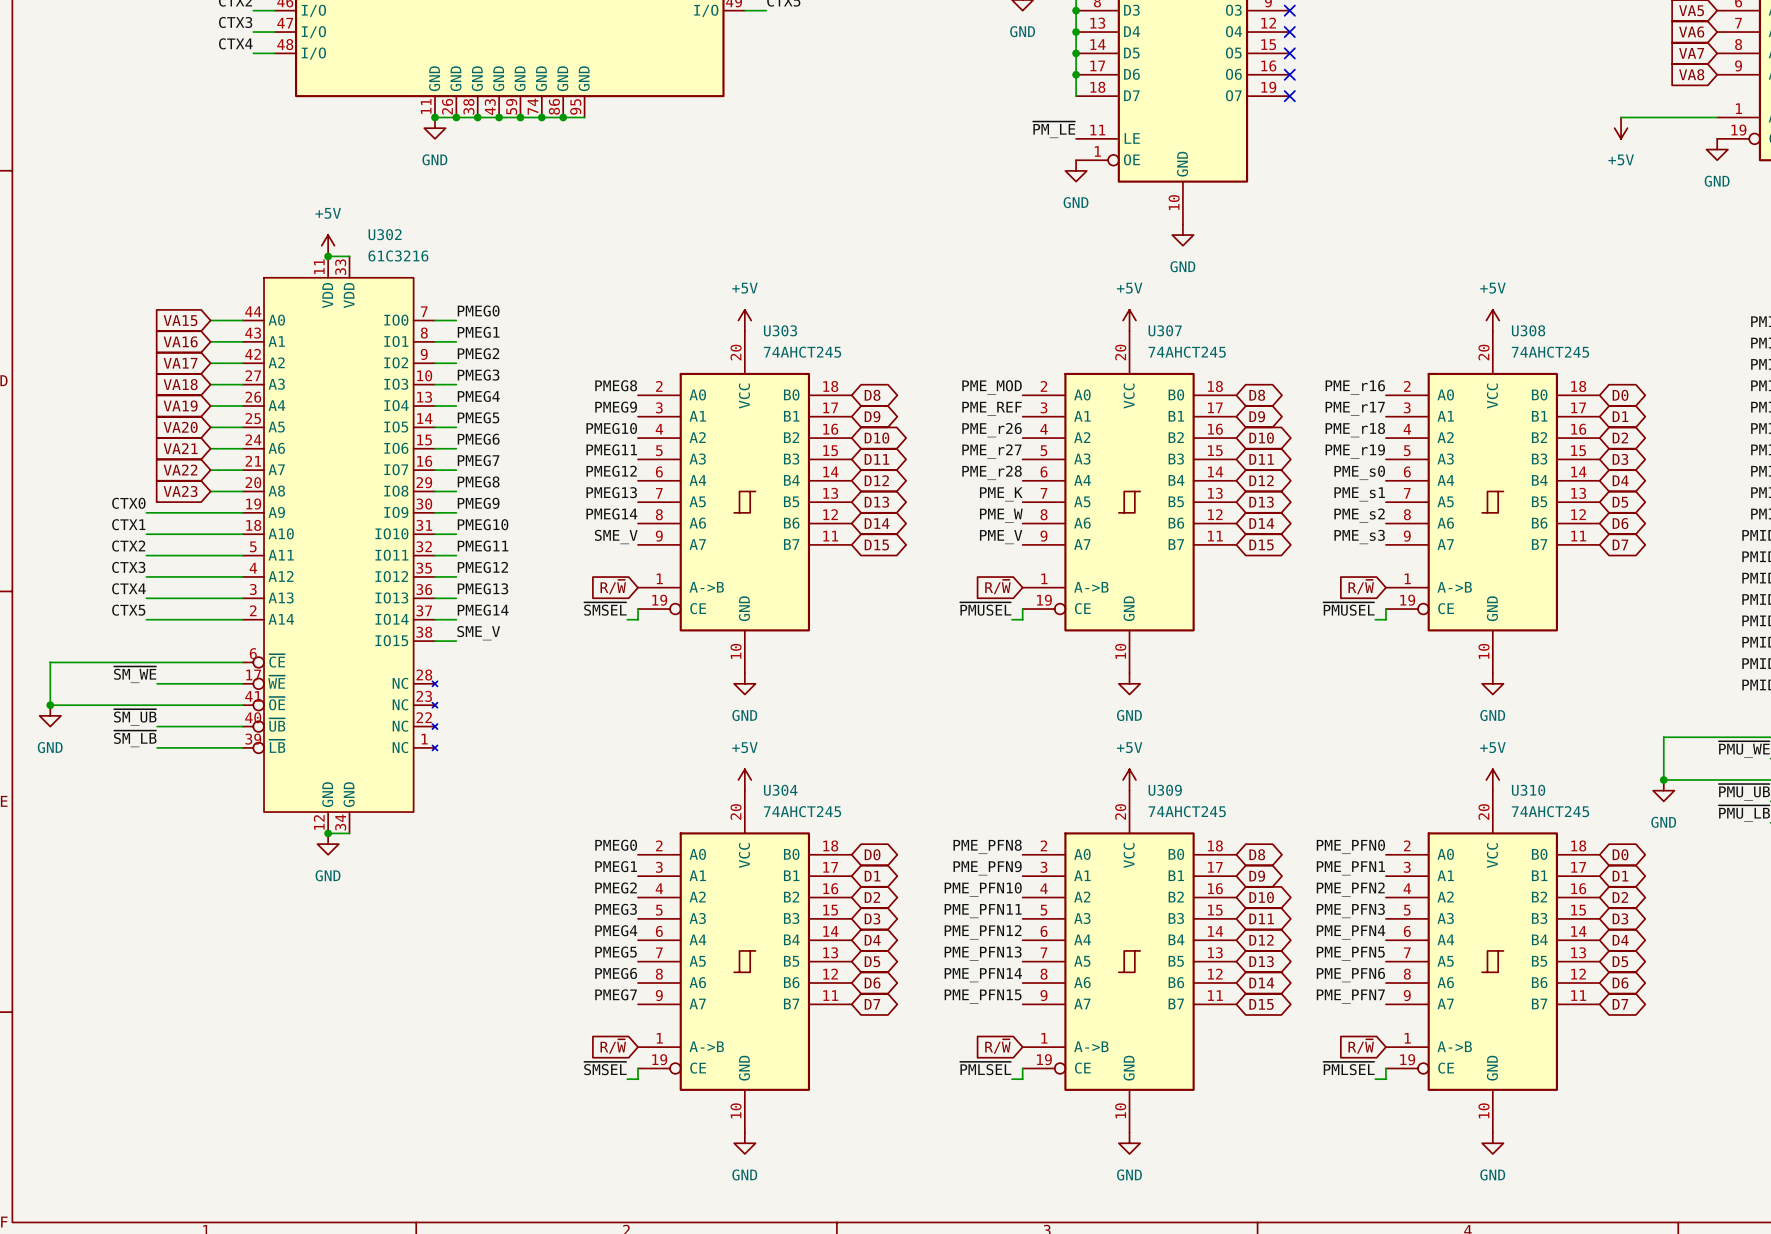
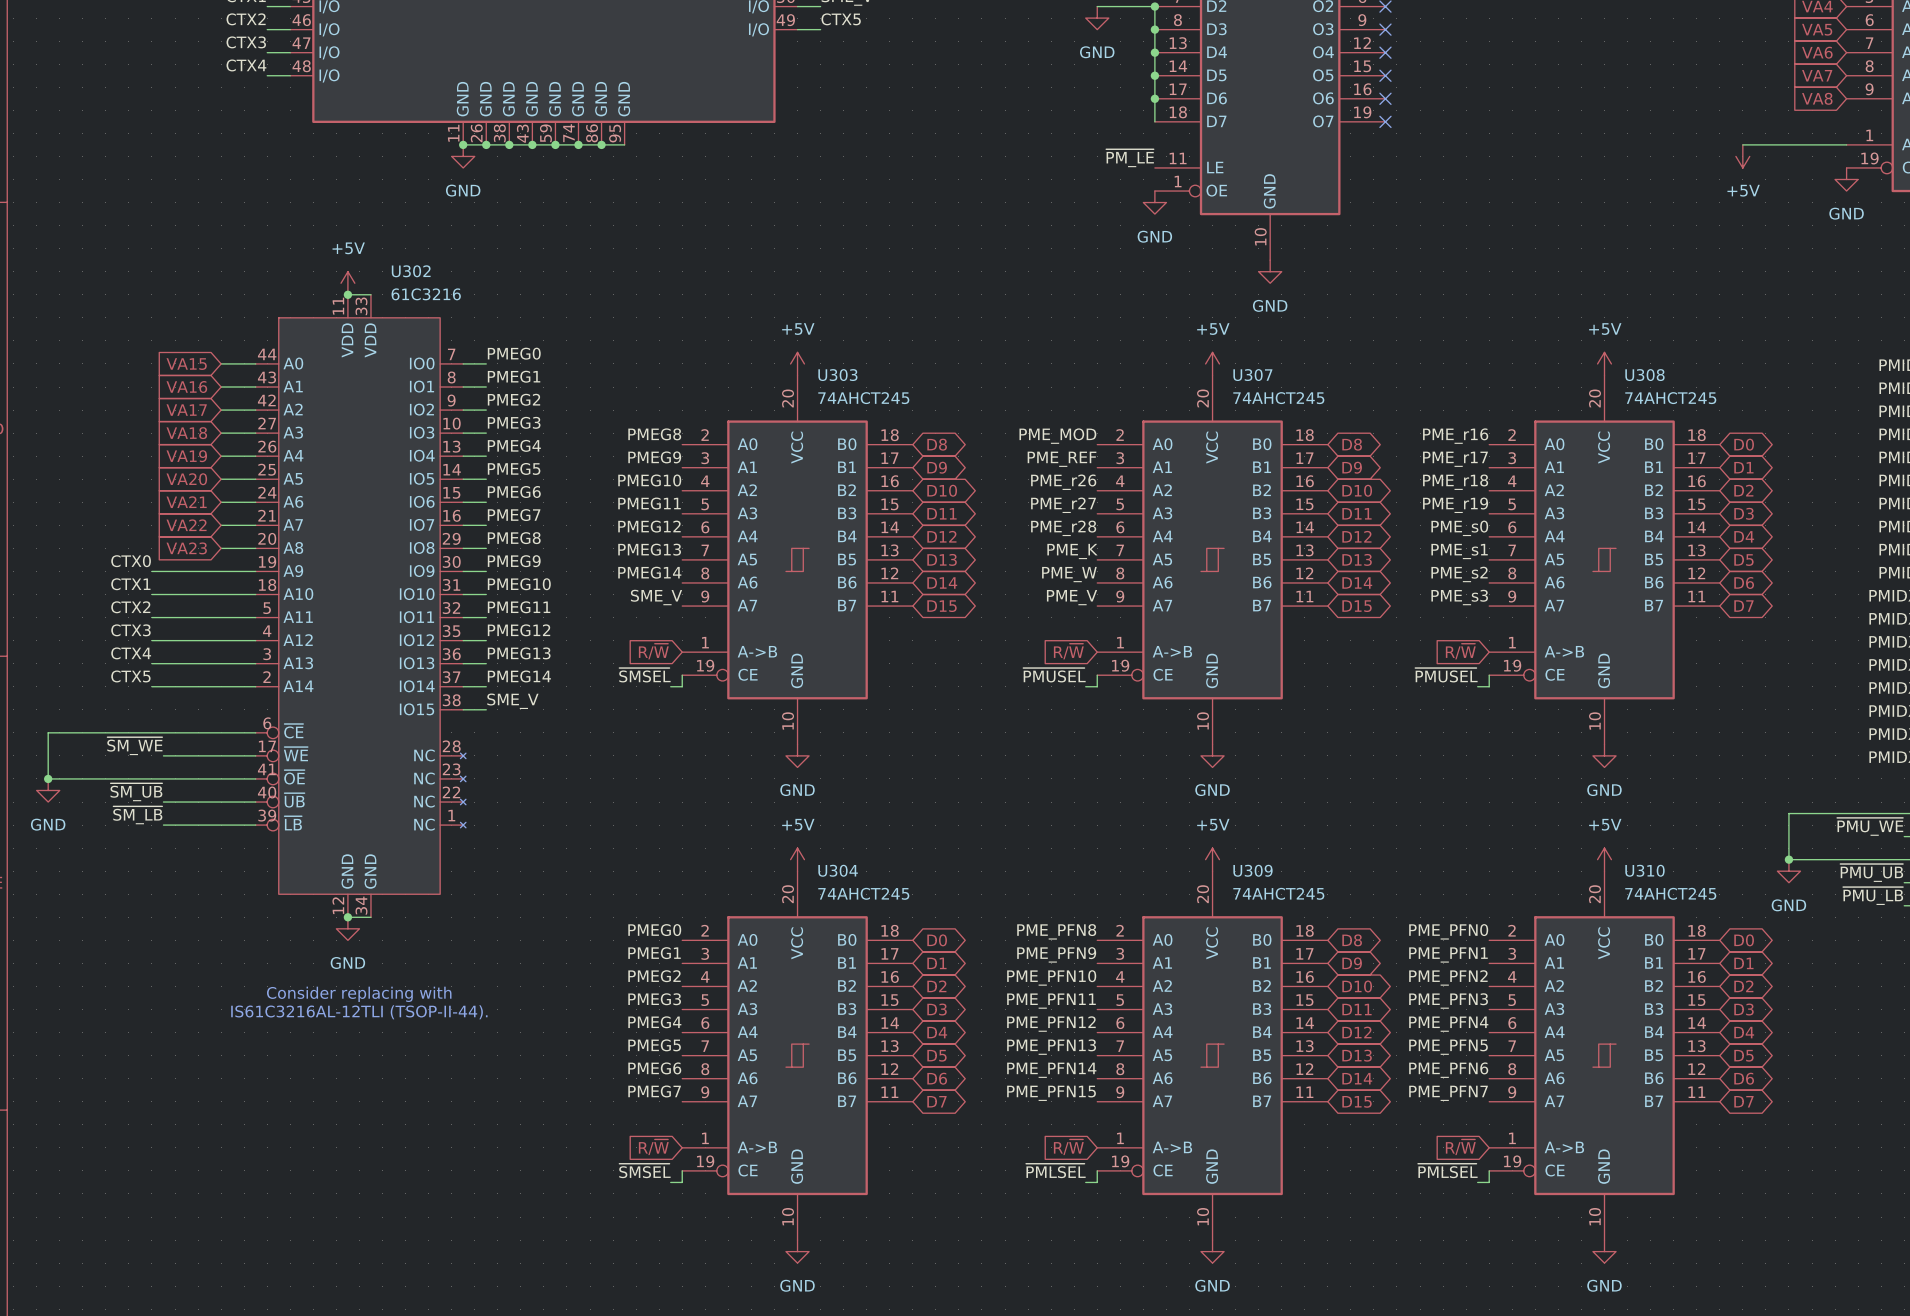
text: none -> Consider replacing with (359, 994)
text: none -> IS61C3216AL-12TLI (TSOP-II-44). (359, 1012)

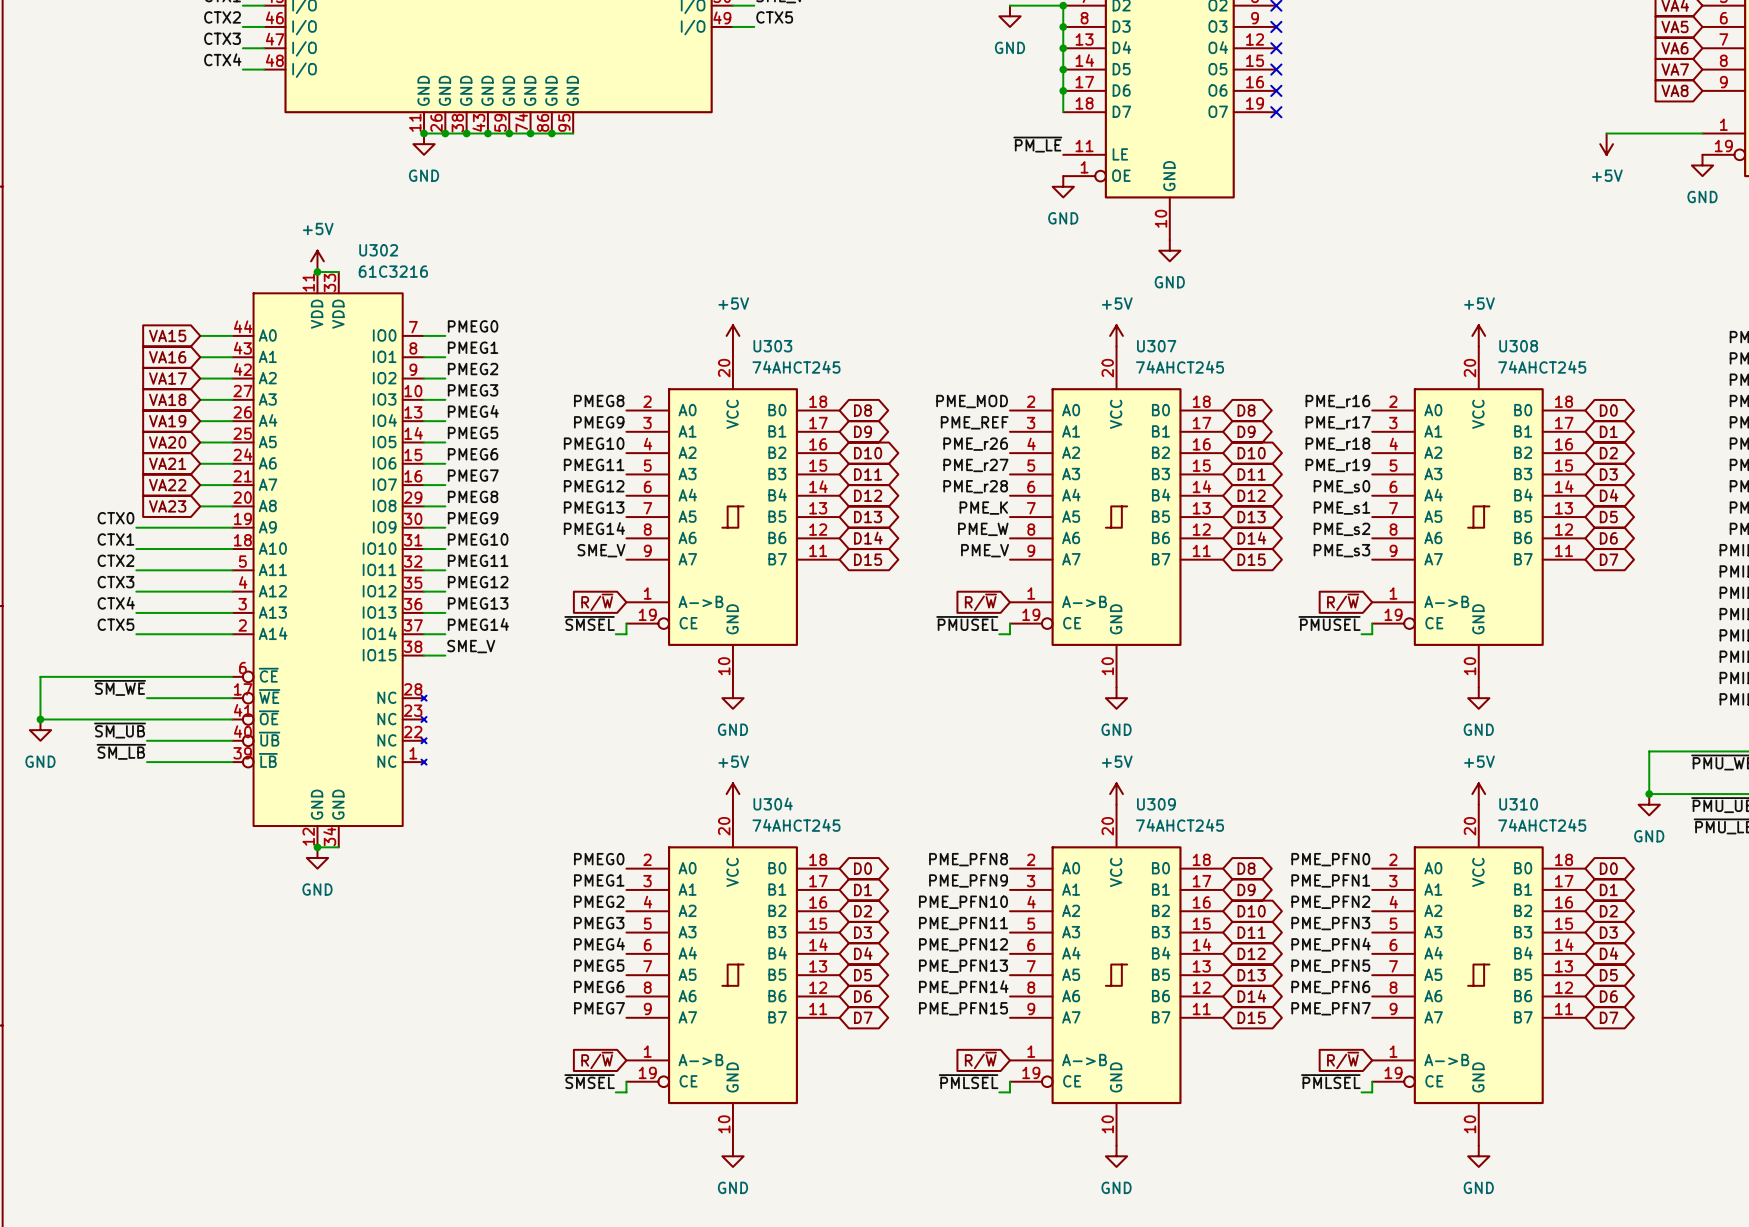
text: Consider replacing with (359, 994) -> none
text: IS61C3216AL-12TLI (TSOP-II-44). (359, 1012) -> none

